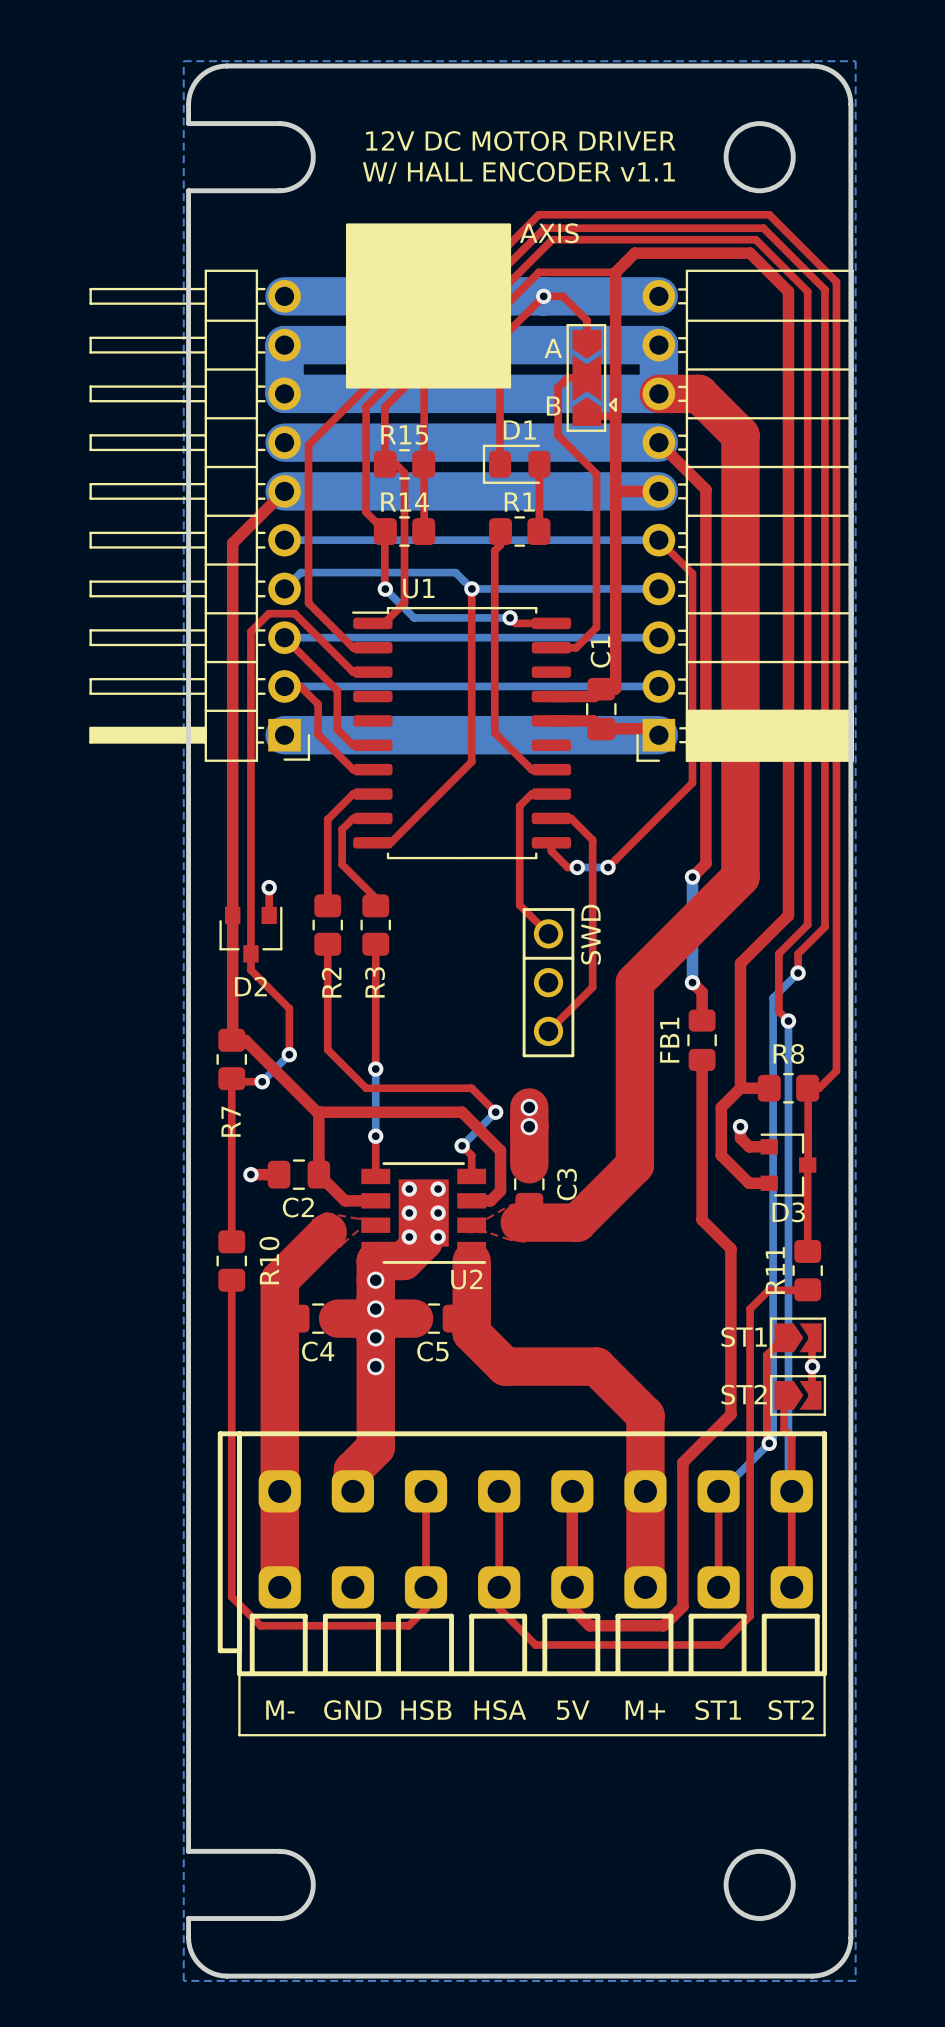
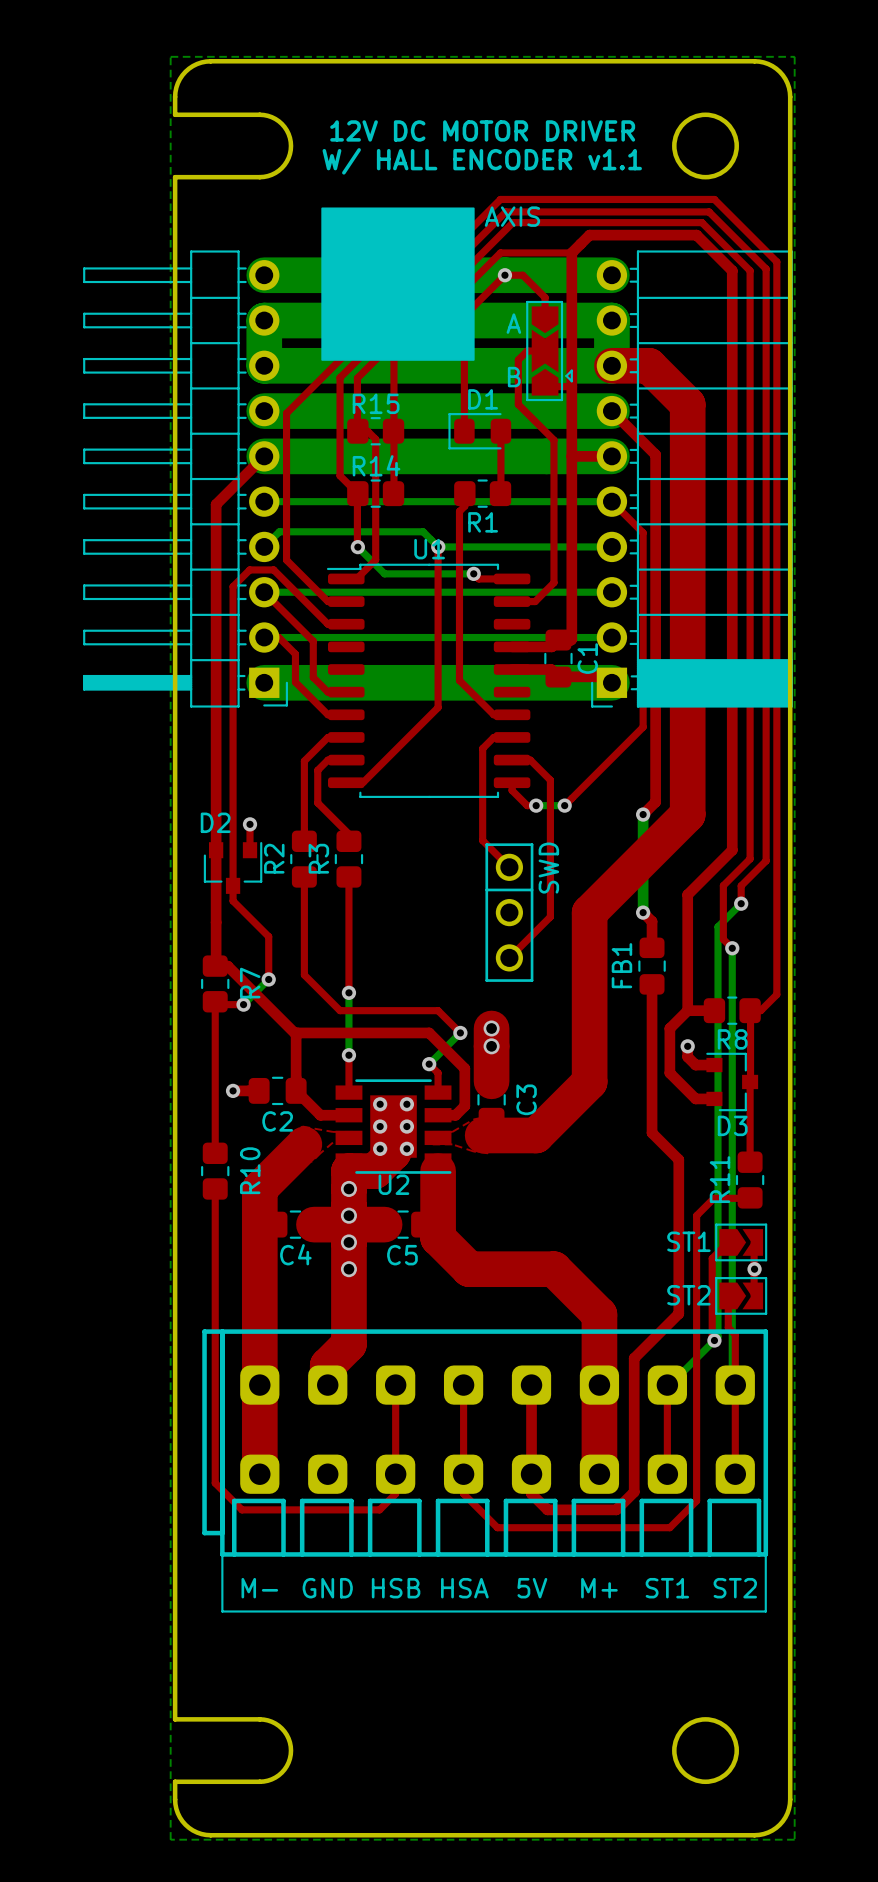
R1 name position: R1 (519, 502) -> R1 (483, 522)
U1 name position: U1 (418, 588) -> U1 (429, 549)
C1 name position: C1 (600, 651) -> C1 (587, 658)
R2 name position: R2 (331, 982) -> R2 (274, 858)
R3 name position: R3 (375, 982) -> R3 (318, 858)
D2 name position: D2 (250, 986) -> D2 (215, 822)
R8 name position: R8 (788, 1053) -> R8 (732, 1039)
R7 name position: R7 (231, 1121) -> R7 (250, 983)
U2 name position: U2 (466, 1279) -> U2 (393, 1184)

